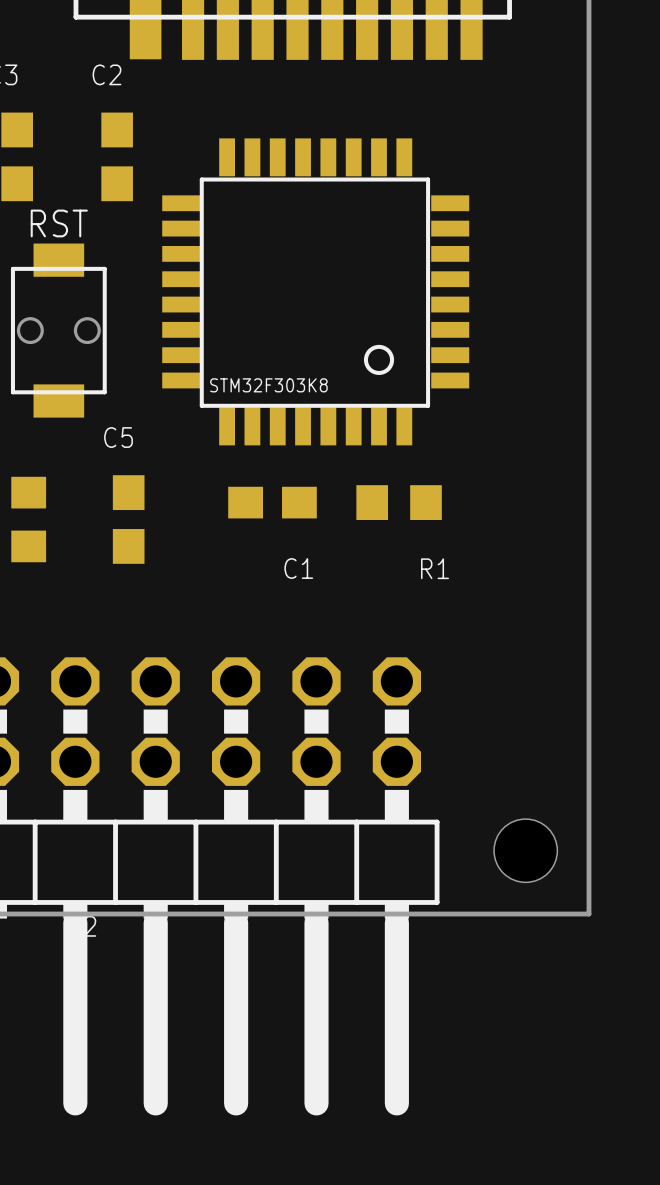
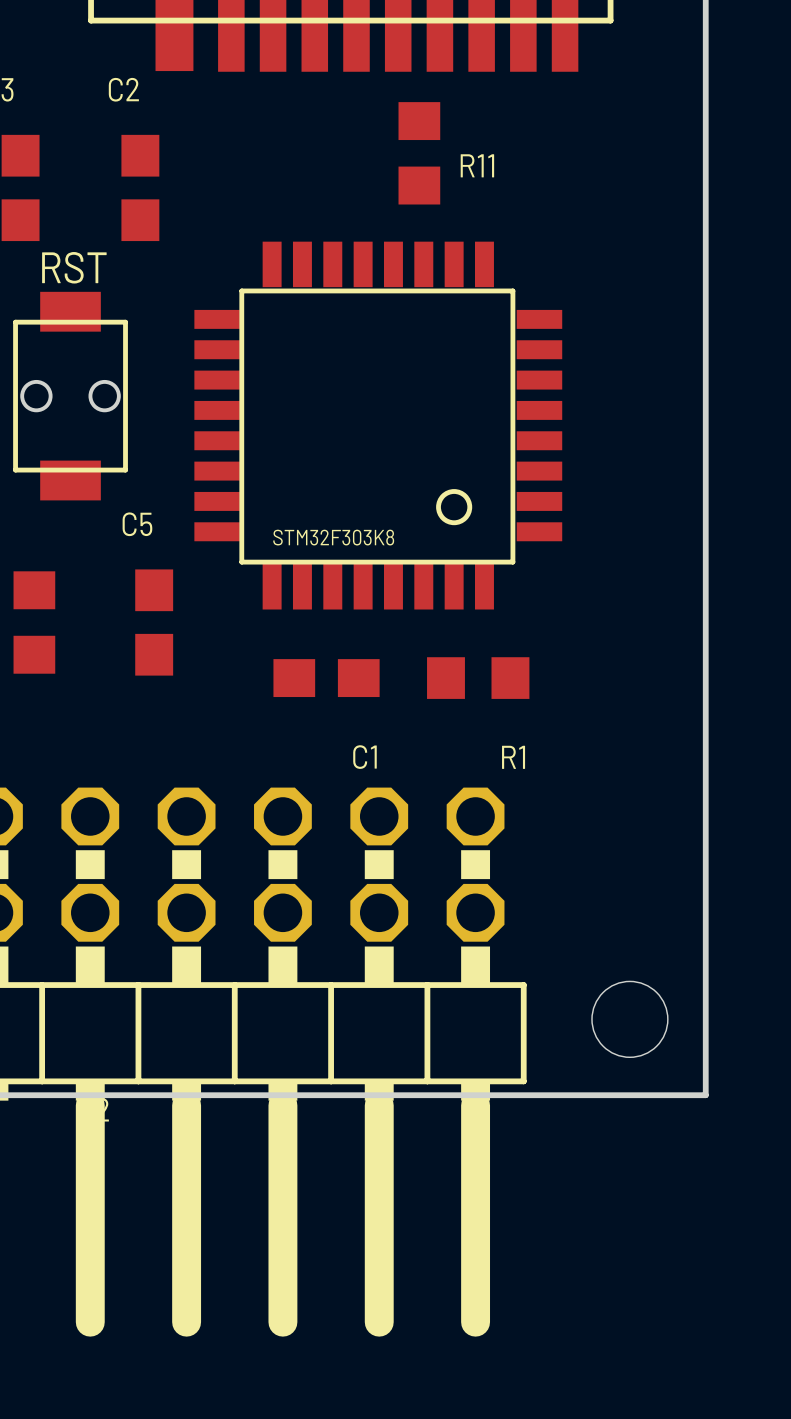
R11: none -> (419, 153)
part position: (315, 291) -> (378, 425)
C1 position: (272, 502) -> (326, 678)
R1 position: (399, 502) -> (478, 678)

